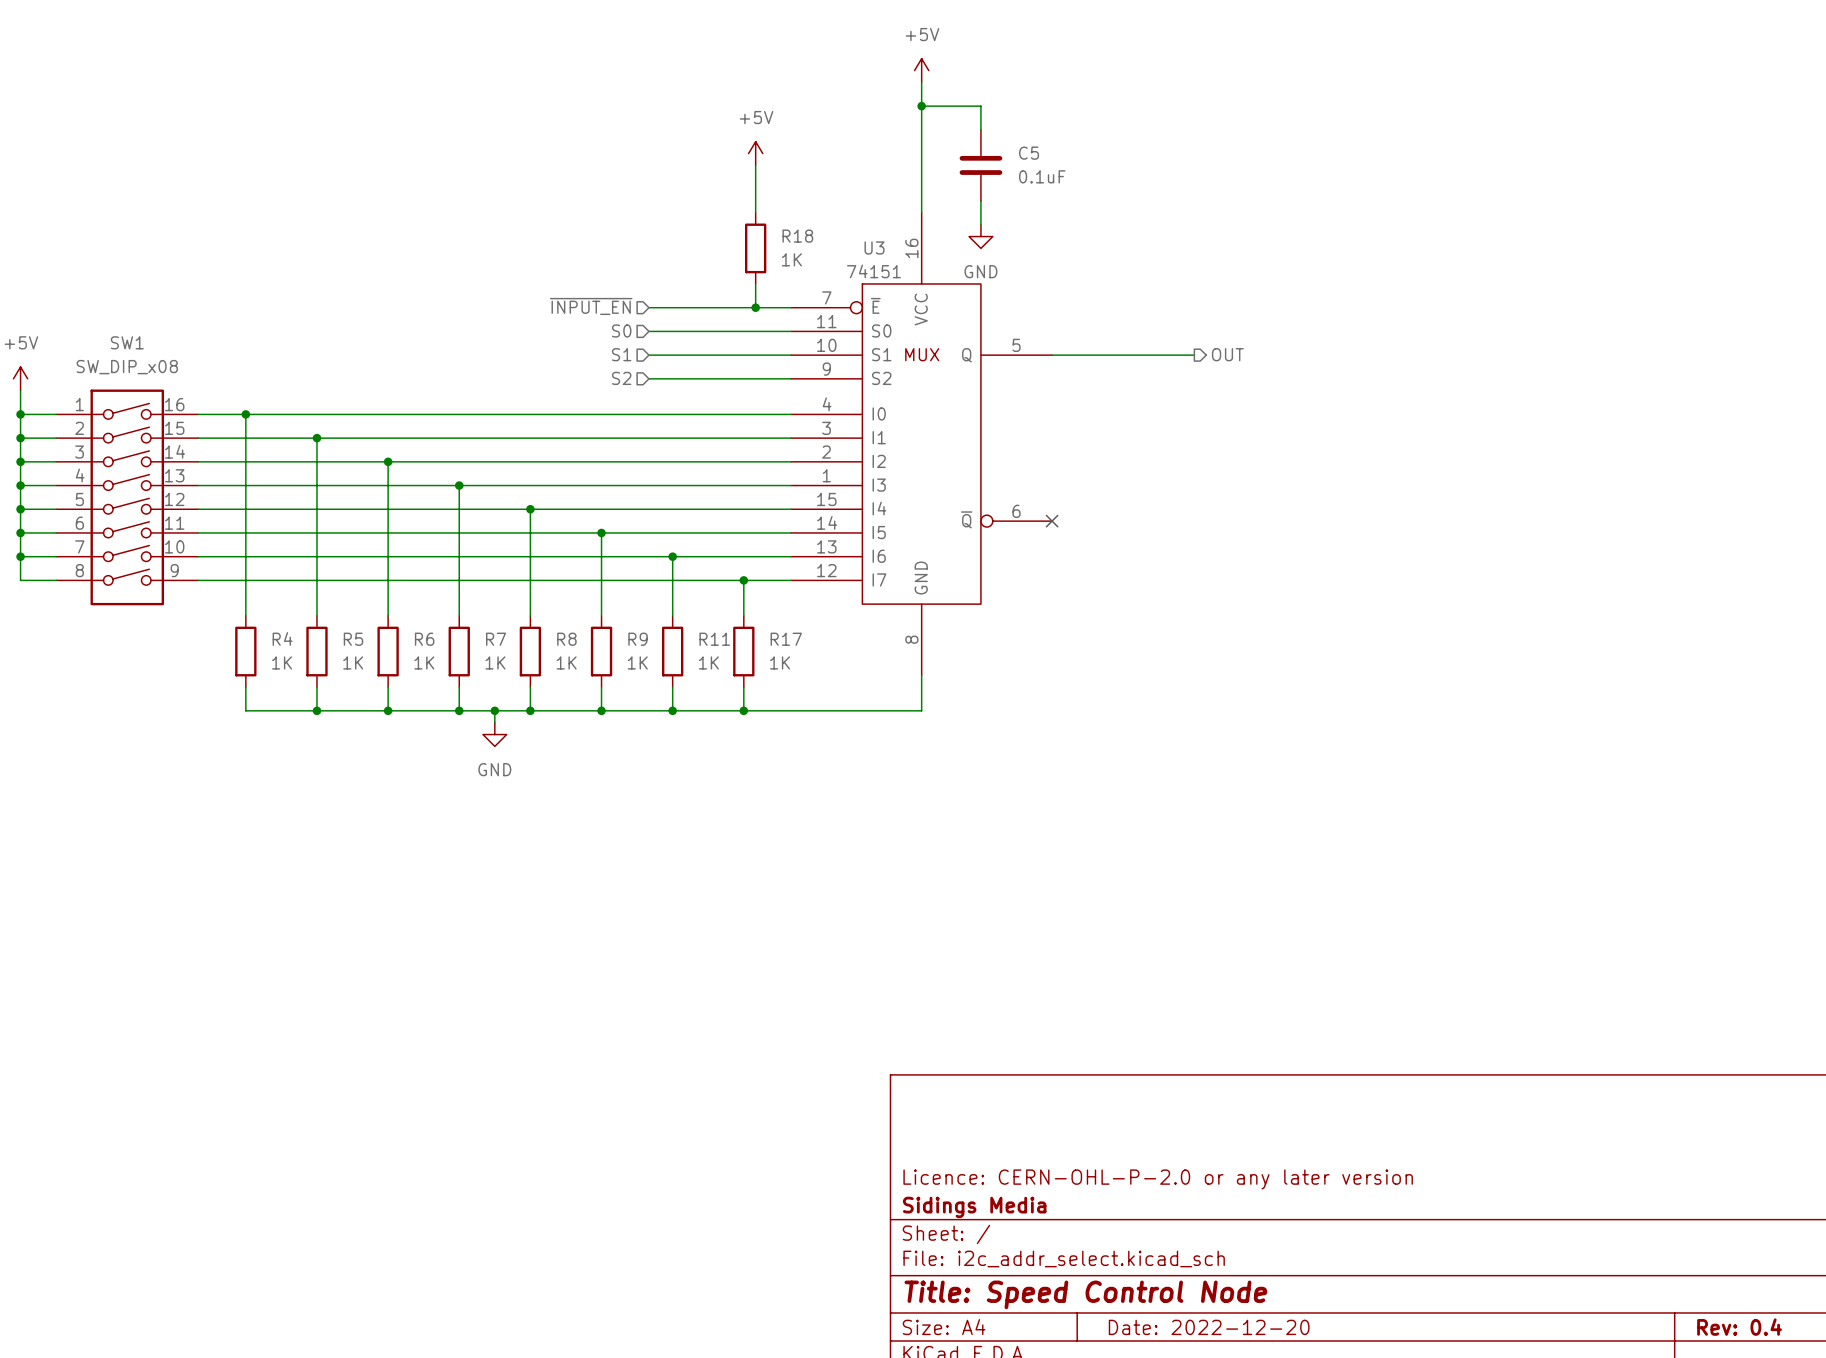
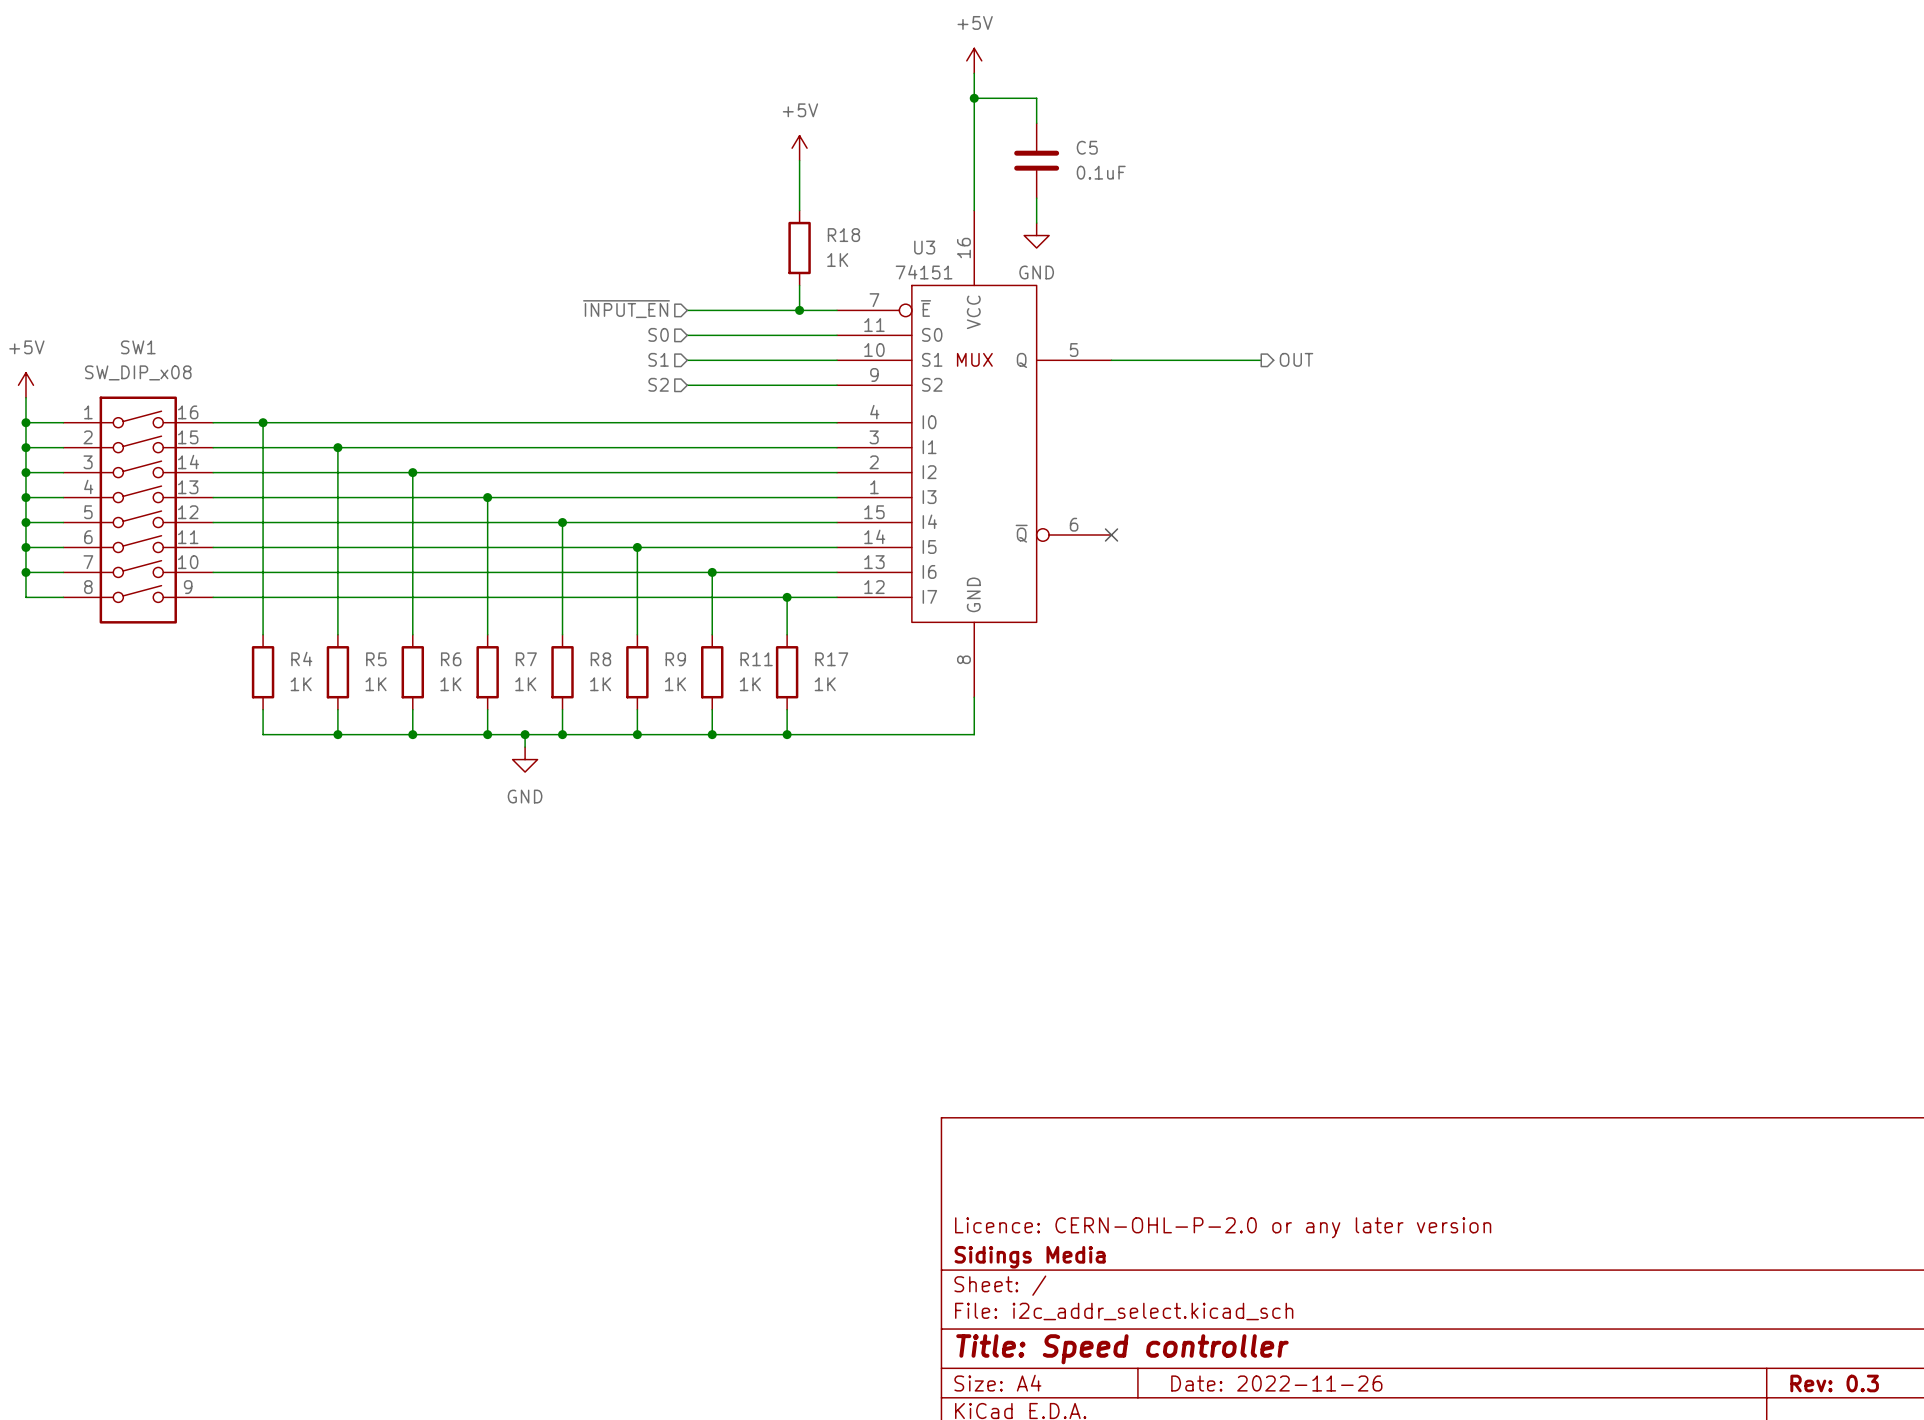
title block: Title: Speed Control Node (1085, 1294) -> Title: Speed controller (1122, 1349)
title block: Date: 2022-12-20 (1209, 1327) -> Date: 2022-11-26 (1276, 1383)
title block: Rev: 0.4 (1739, 1327) -> Rev: 0.3 (1834, 1383)

